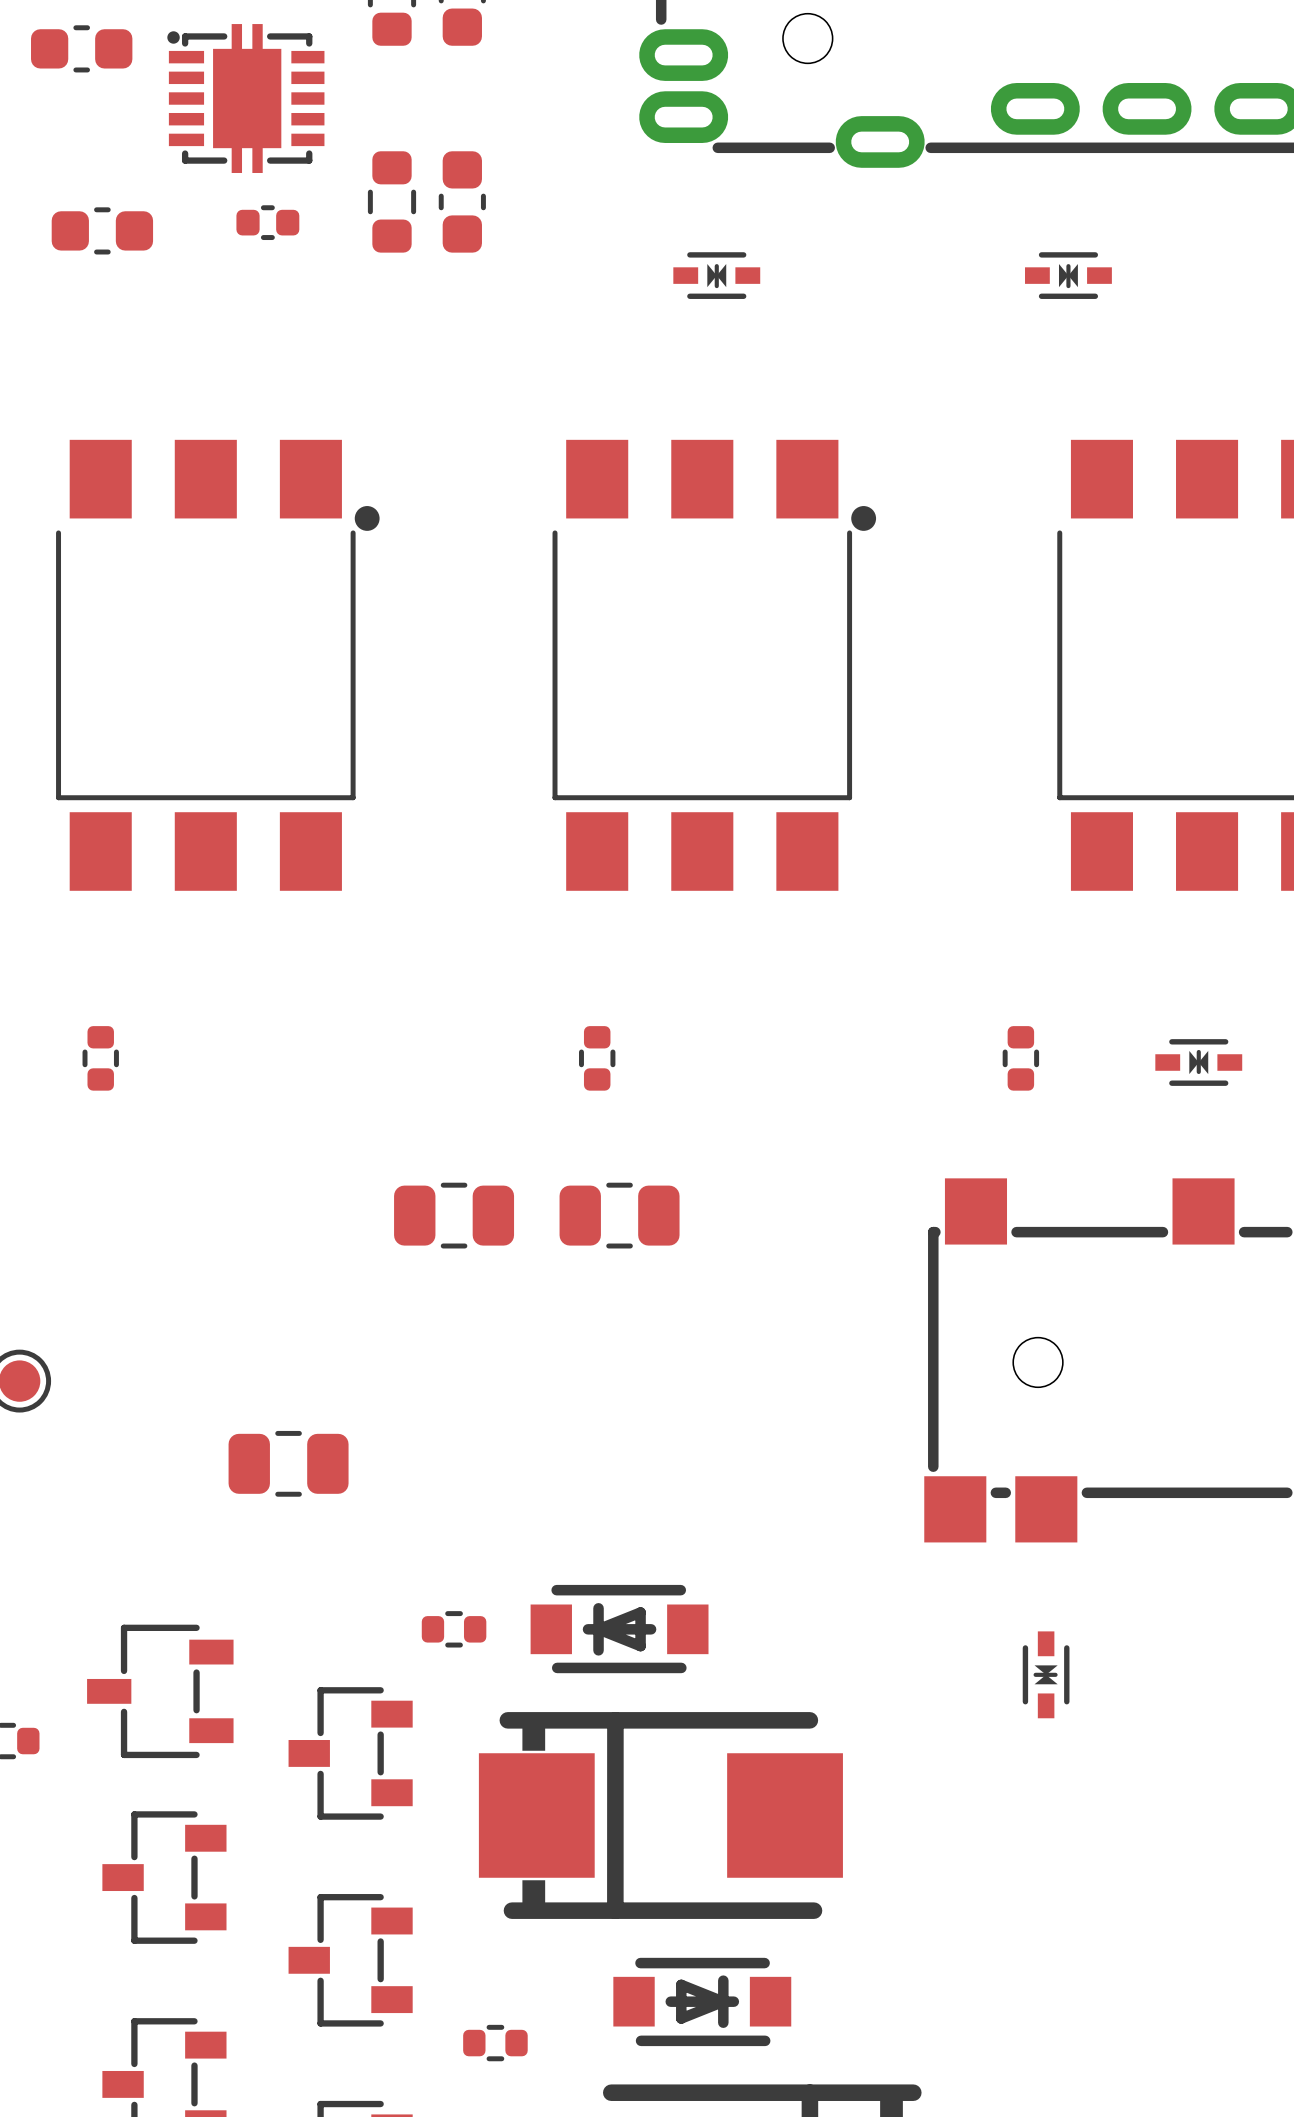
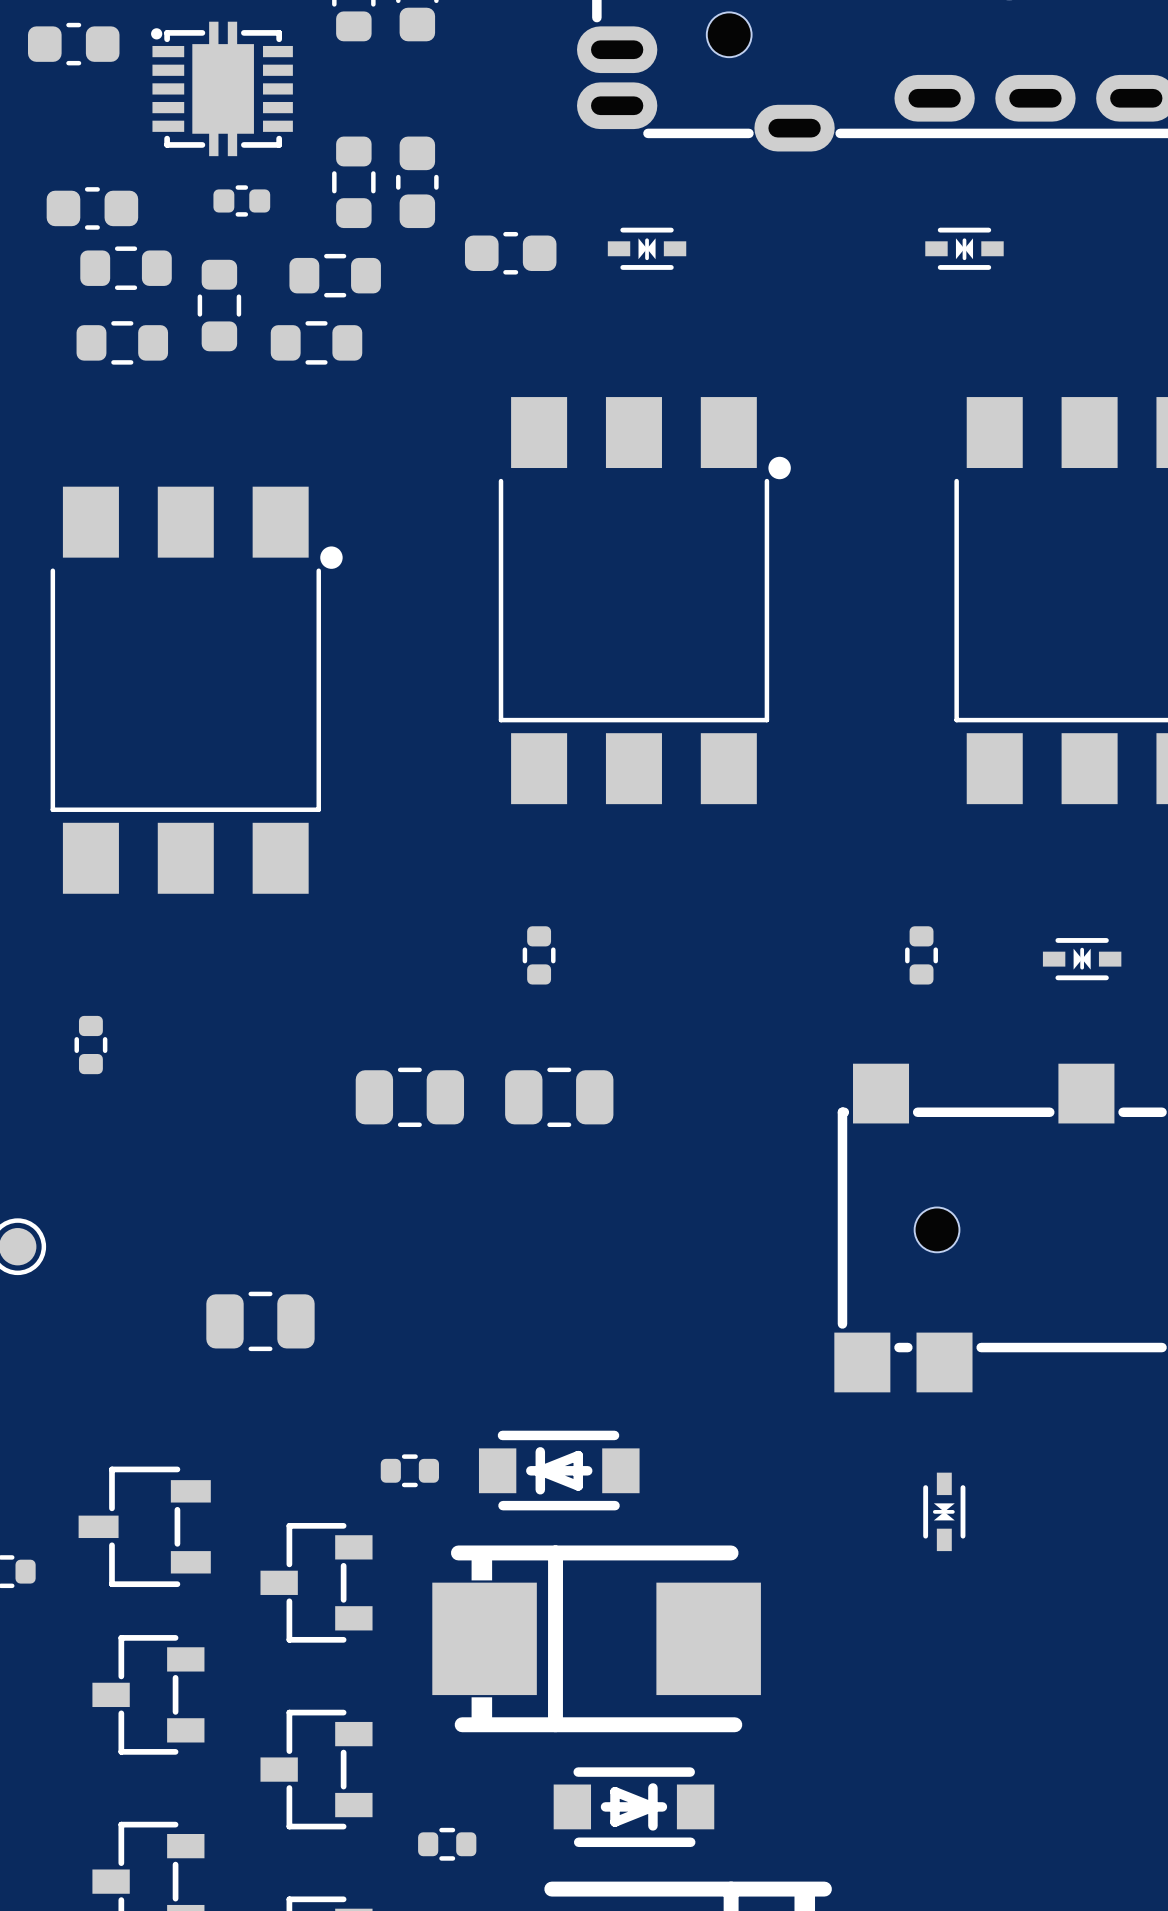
part: none -> (510, 253)
part: none -> (126, 268)
part: none -> (335, 275)
part: none -> (219, 305)
part: none -> (122, 342)
part: none -> (316, 342)
part position: (217, 665) -> (196, 690)
part position: (100, 1058) -> (90, 1045)

